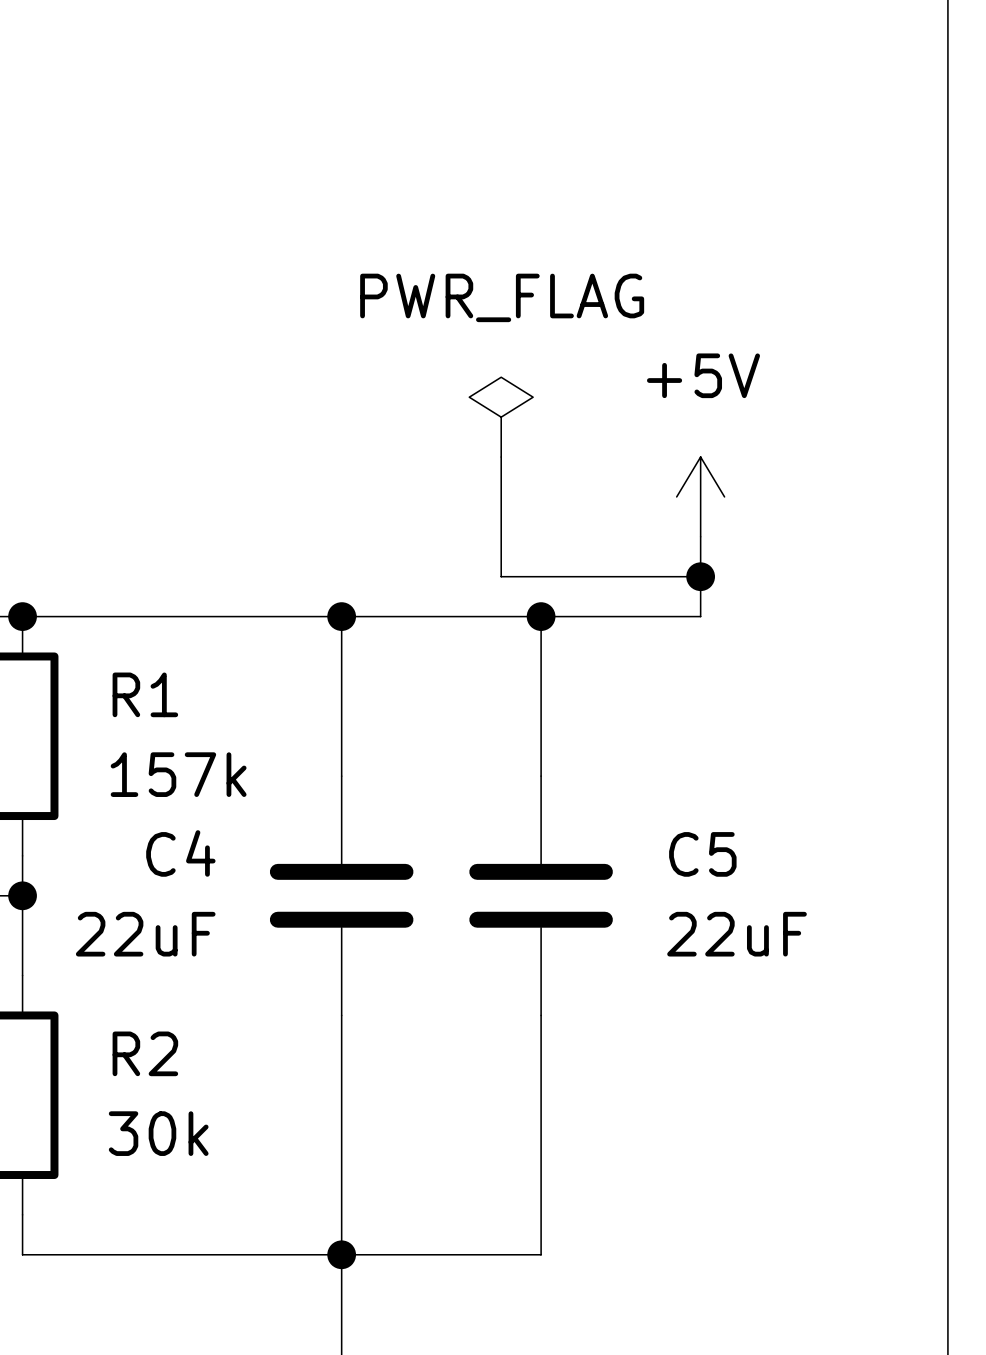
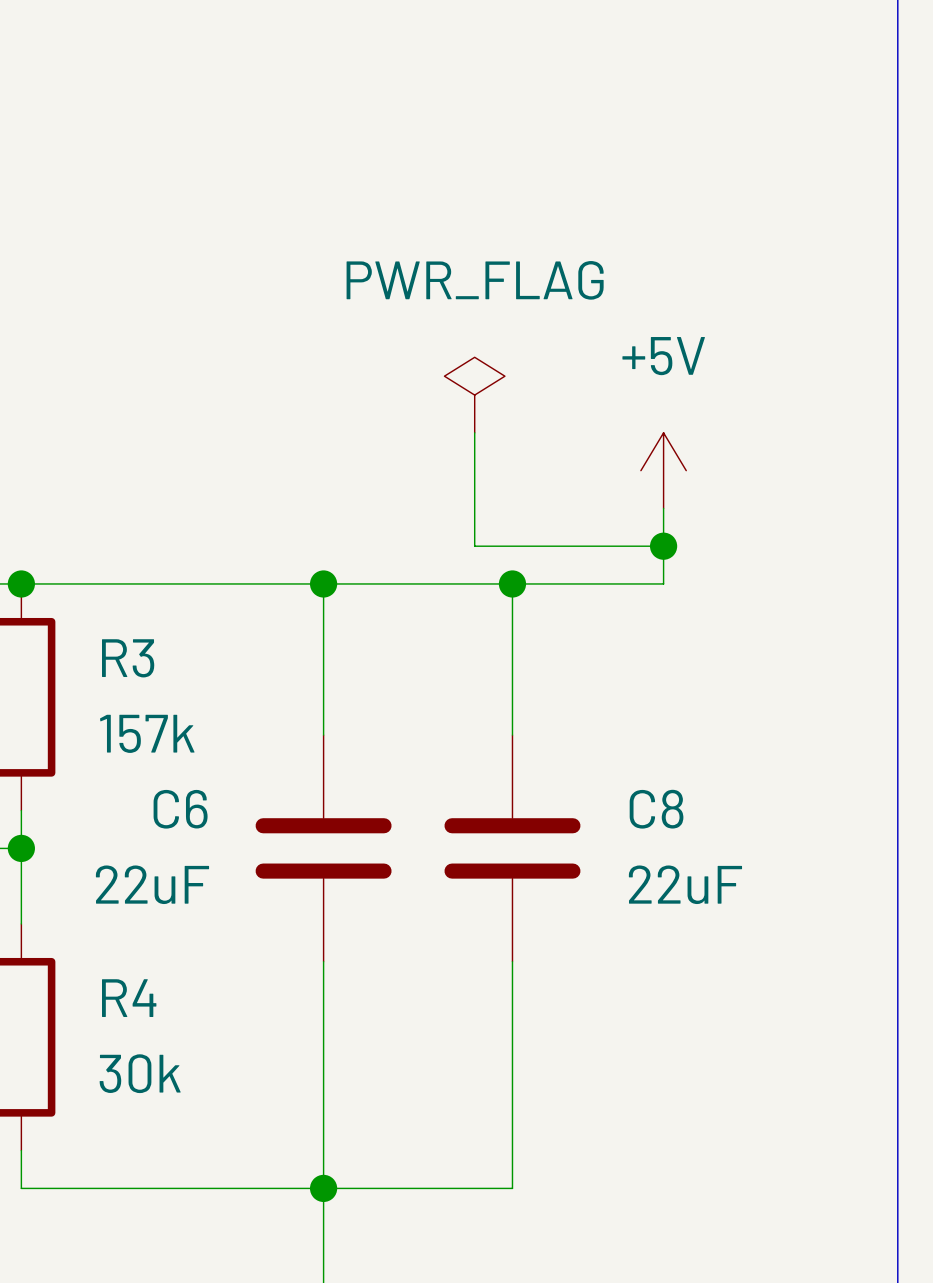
R1 name: R1 (145, 694) -> R3 (128, 658)
C4 name: C4 (180, 853) -> C6 (180, 809)
C5 name: C5 (702, 854) -> C8 (656, 809)
R2 name: R2 (145, 1053) -> R4 (129, 998)

